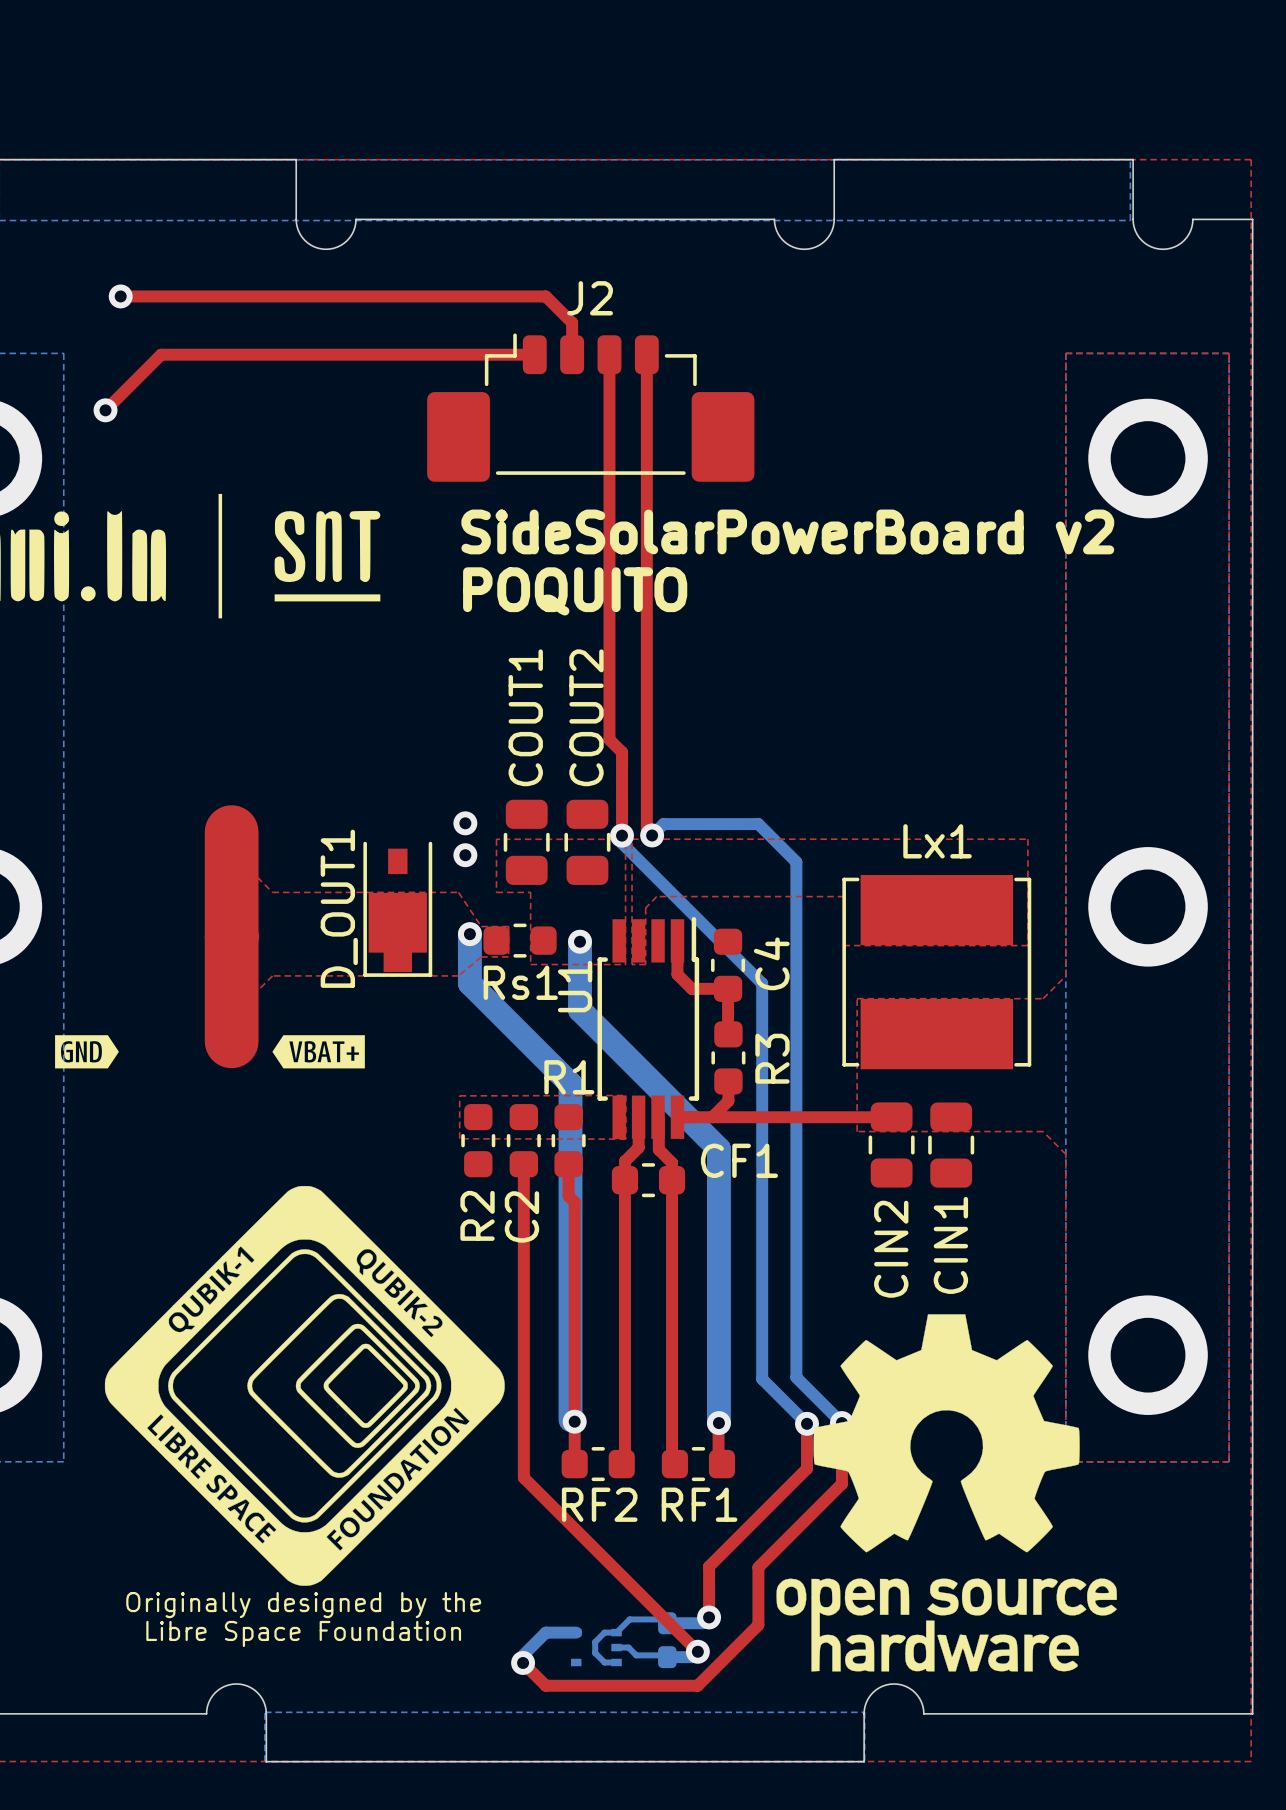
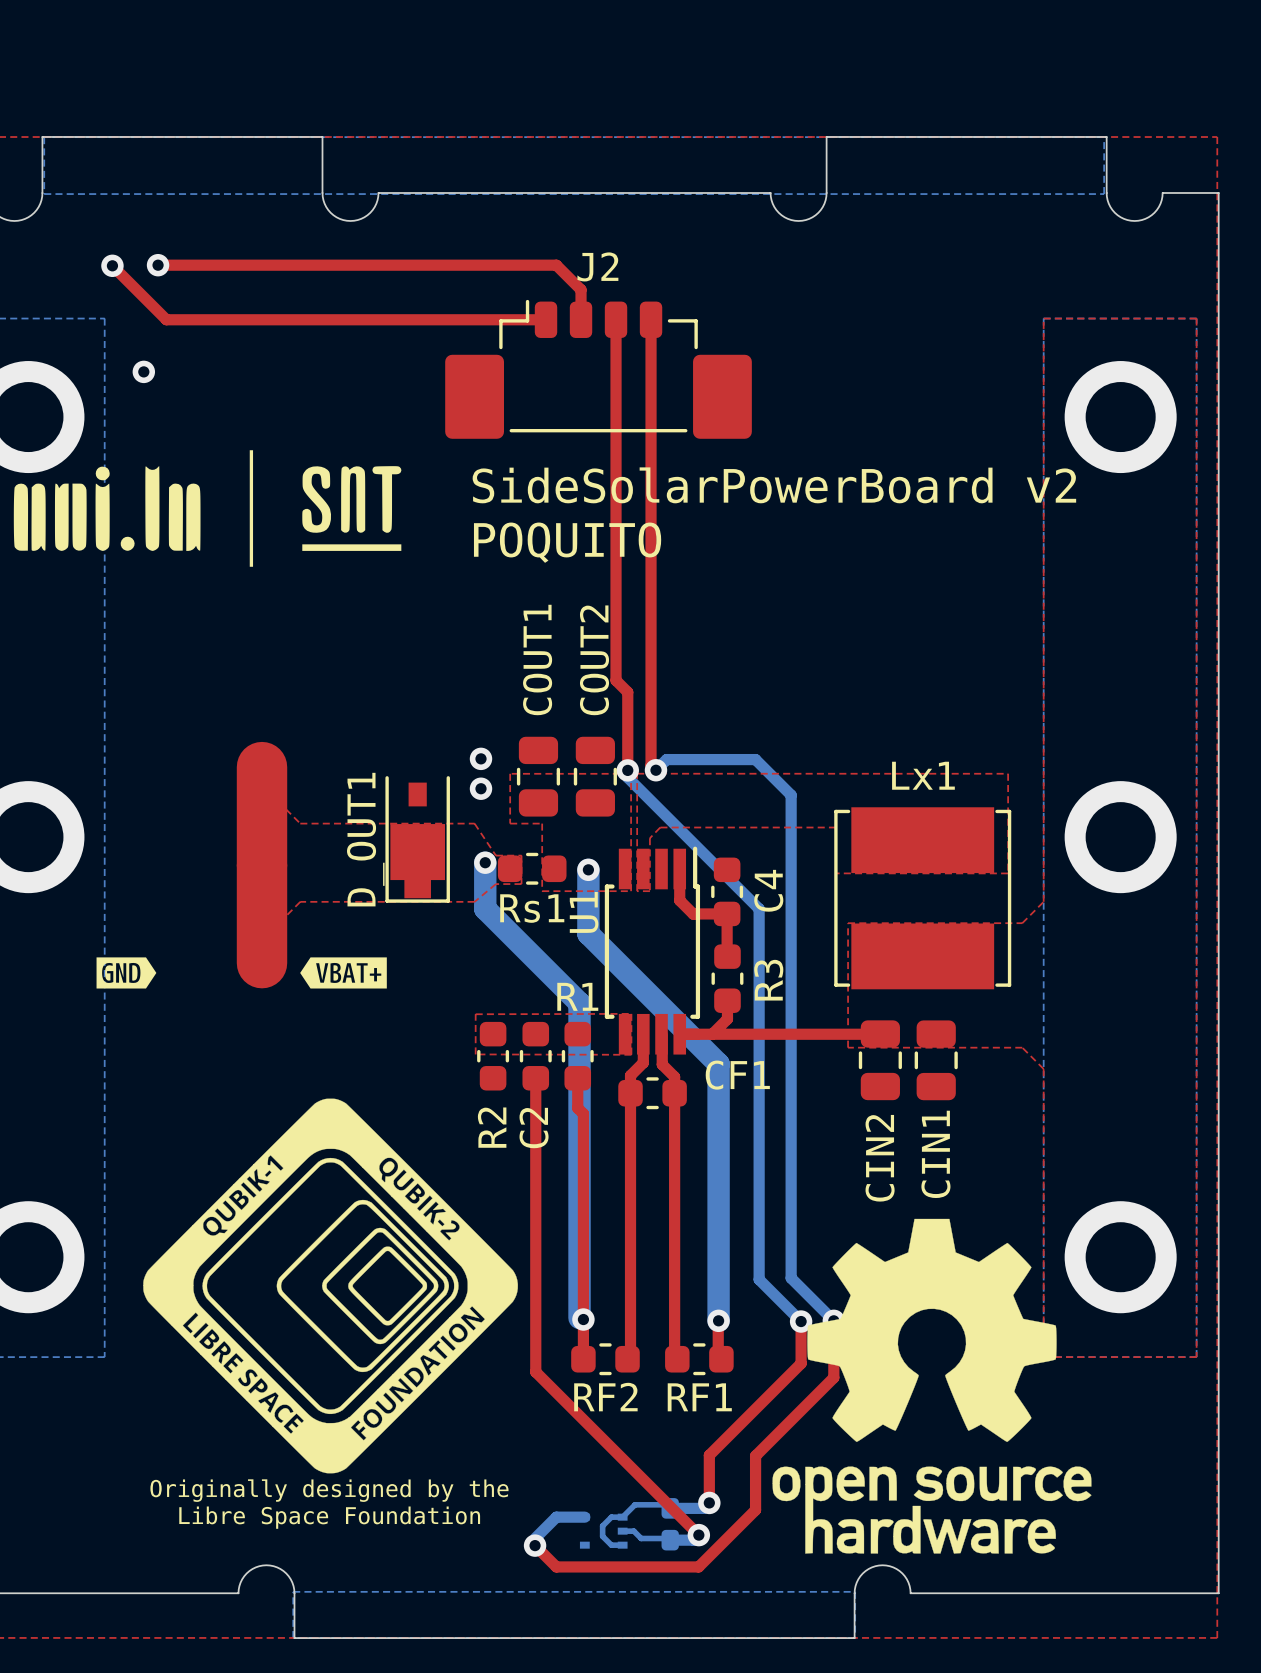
via: none -> (112, 265)
top track: (161, 354) (105, 410) -> (195, 319) (166, 319) (112, 265)

